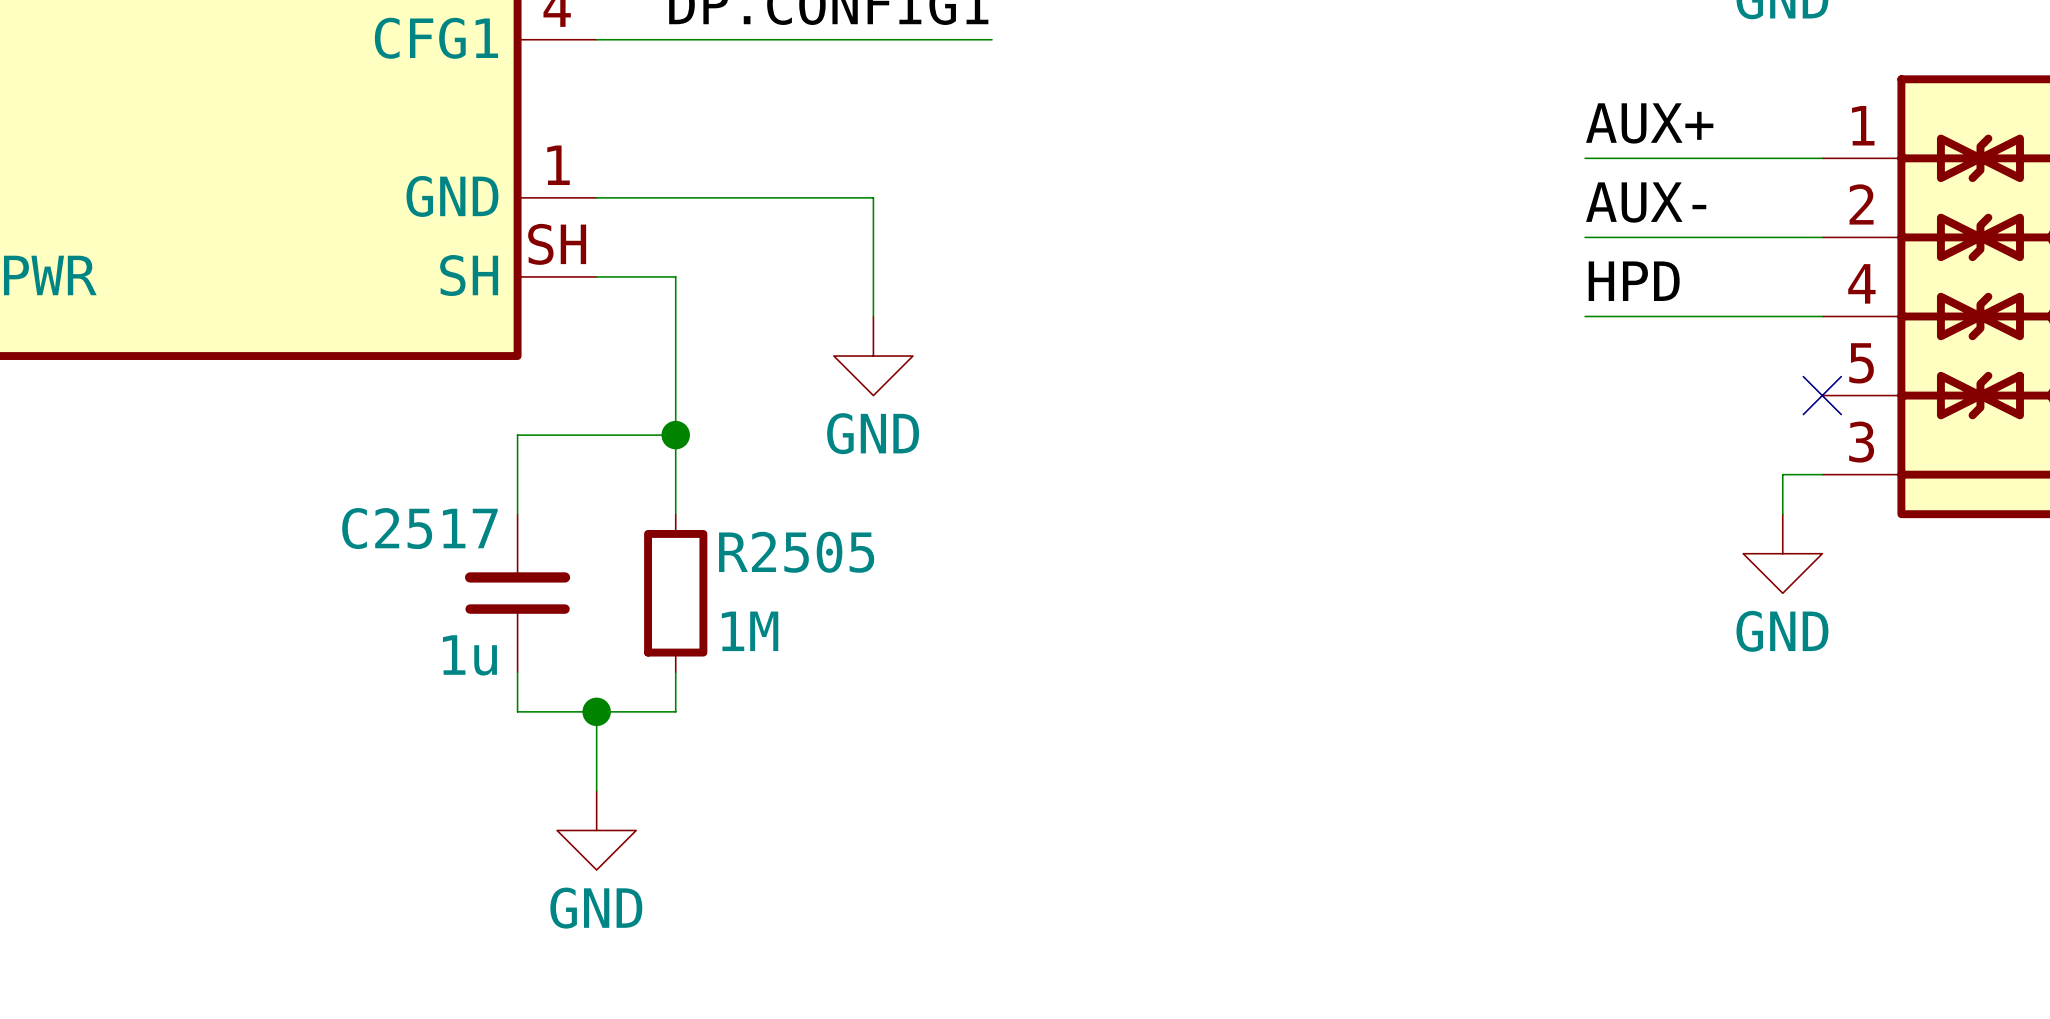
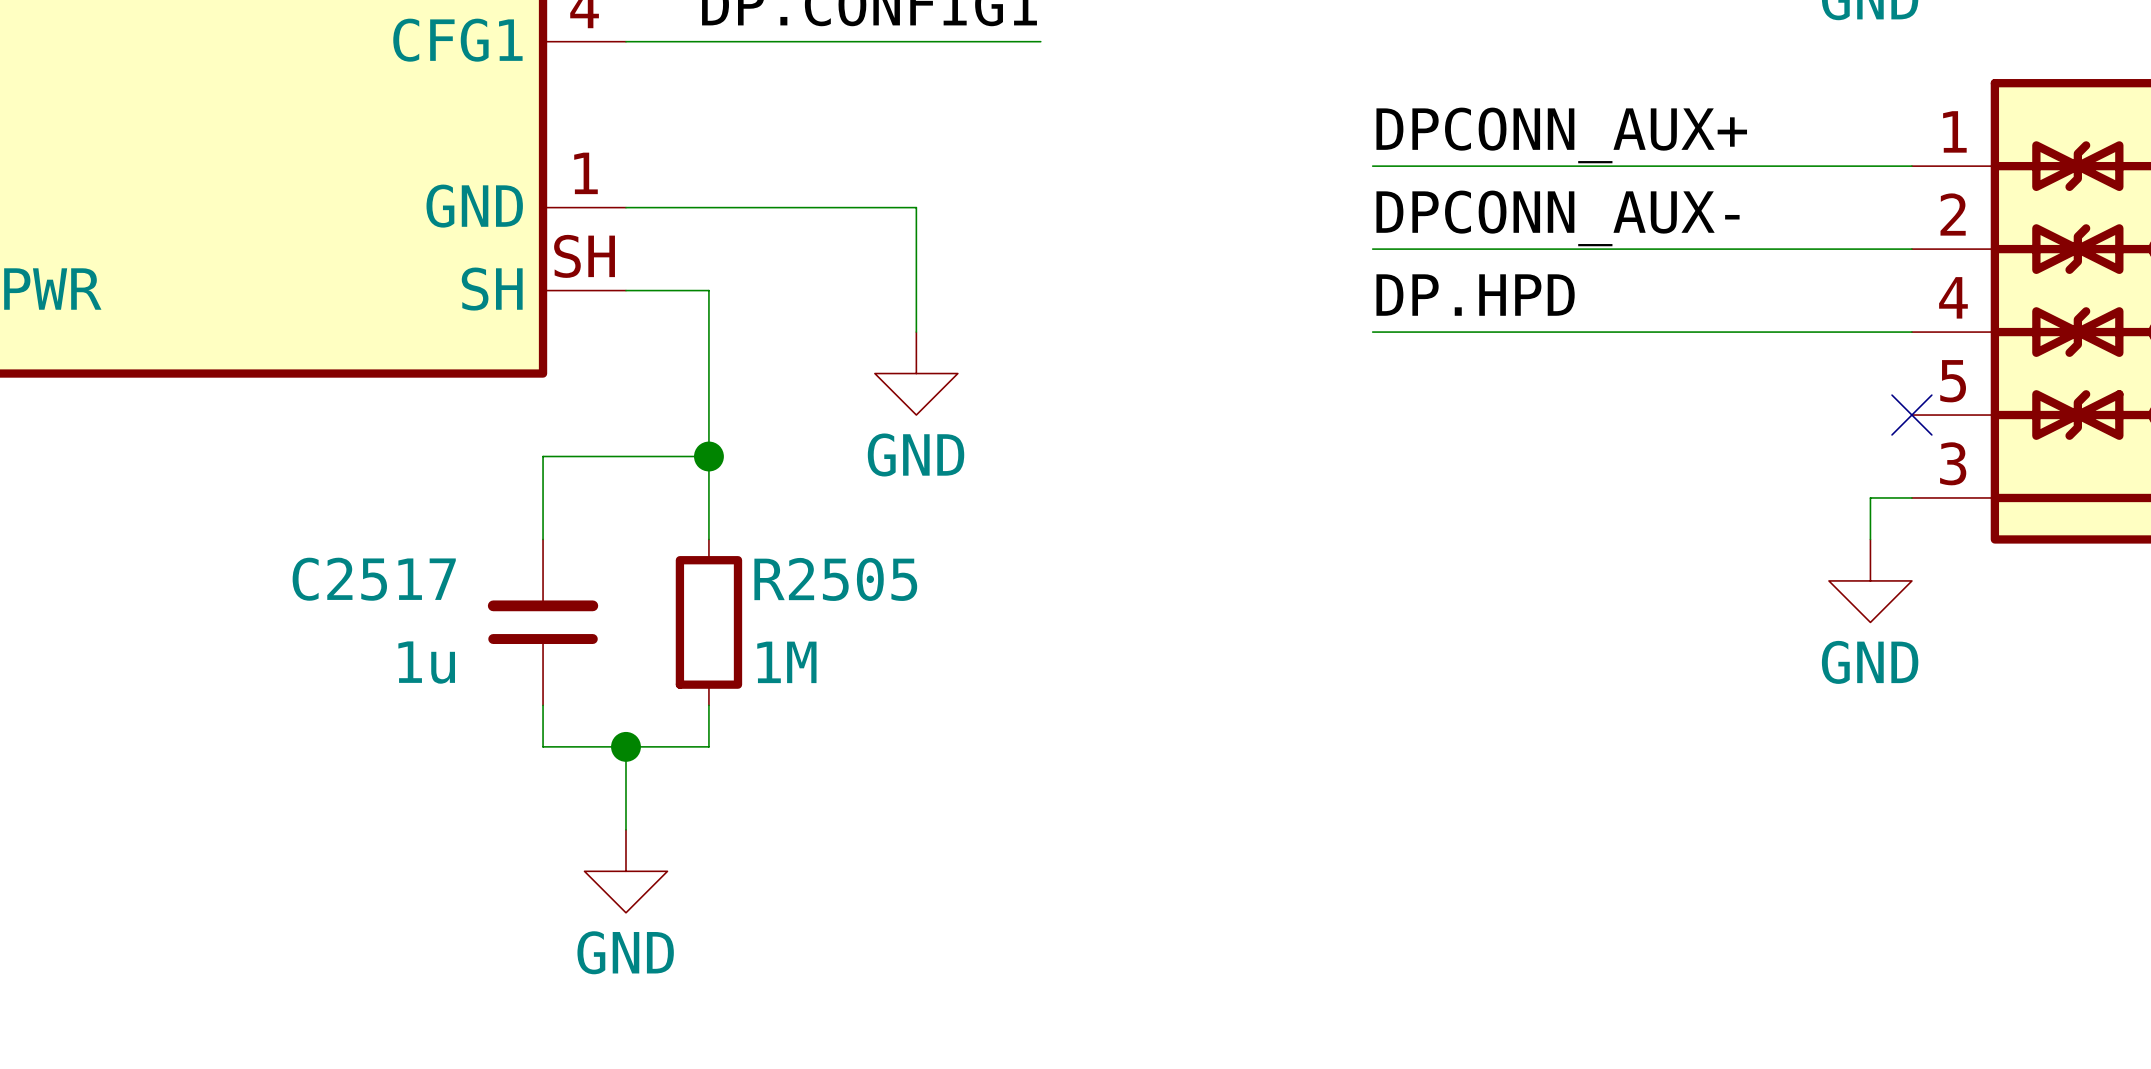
label: AUX+ (1649, 123) -> none
label: none -> DPCONN_AUX+ (1561, 135)
wire: none -> (1372, 166) (1663, 166)
label: AUX- (1646, 202) -> none
label: none -> DPCONN_AUX- (1558, 218)
wire: none -> (1372, 249) (1663, 249)
label: none -> DP.HPD (1475, 295)
label: HPD (1634, 281) -> none
wire: none -> (1372, 332) (1663, 332)
C2517 name position: C2517 (419, 528) -> C2517 (374, 579)
C2517 text position: 1u (469, 655) -> 1u (426, 662)

